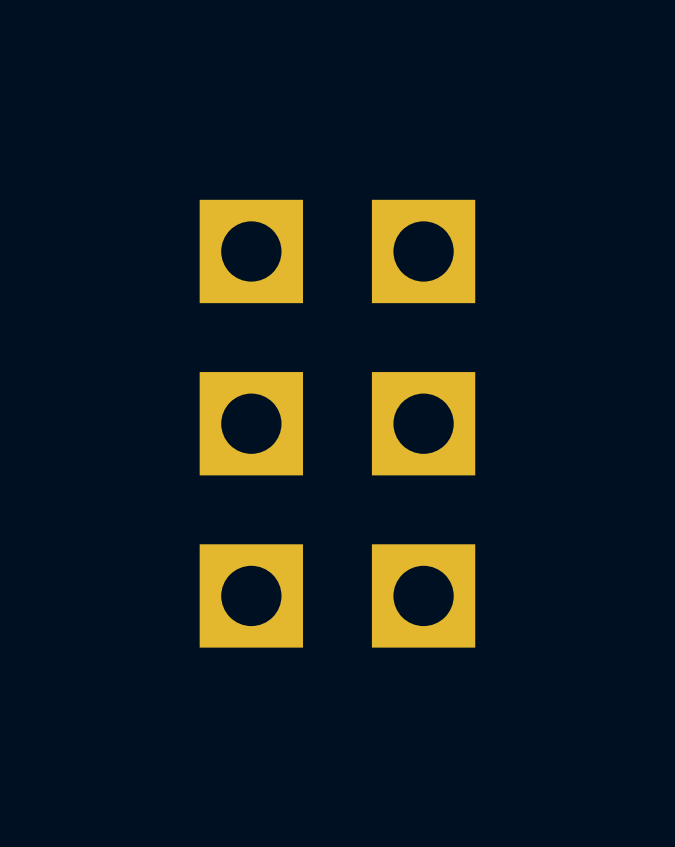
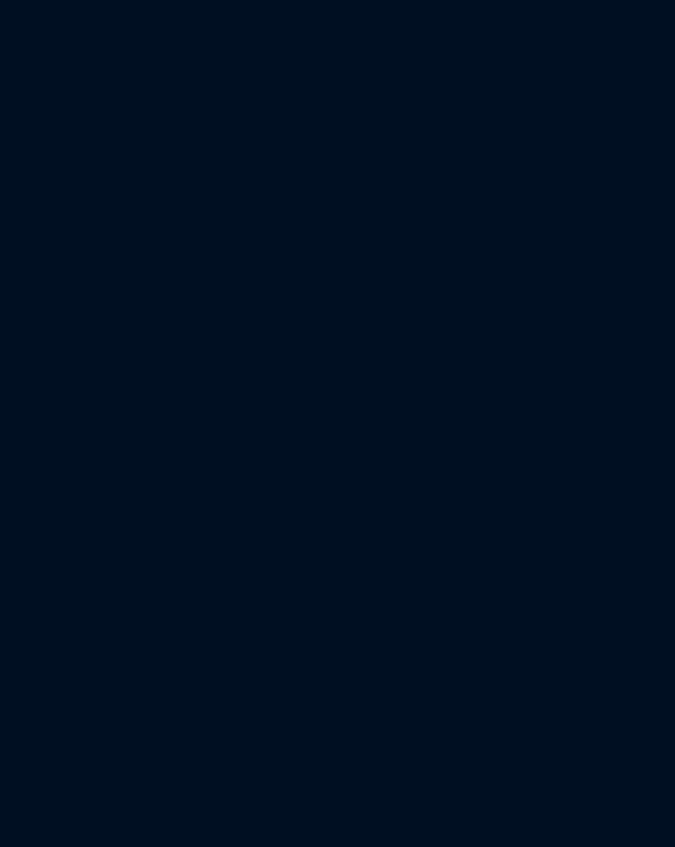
part: (337, 423) -> none

